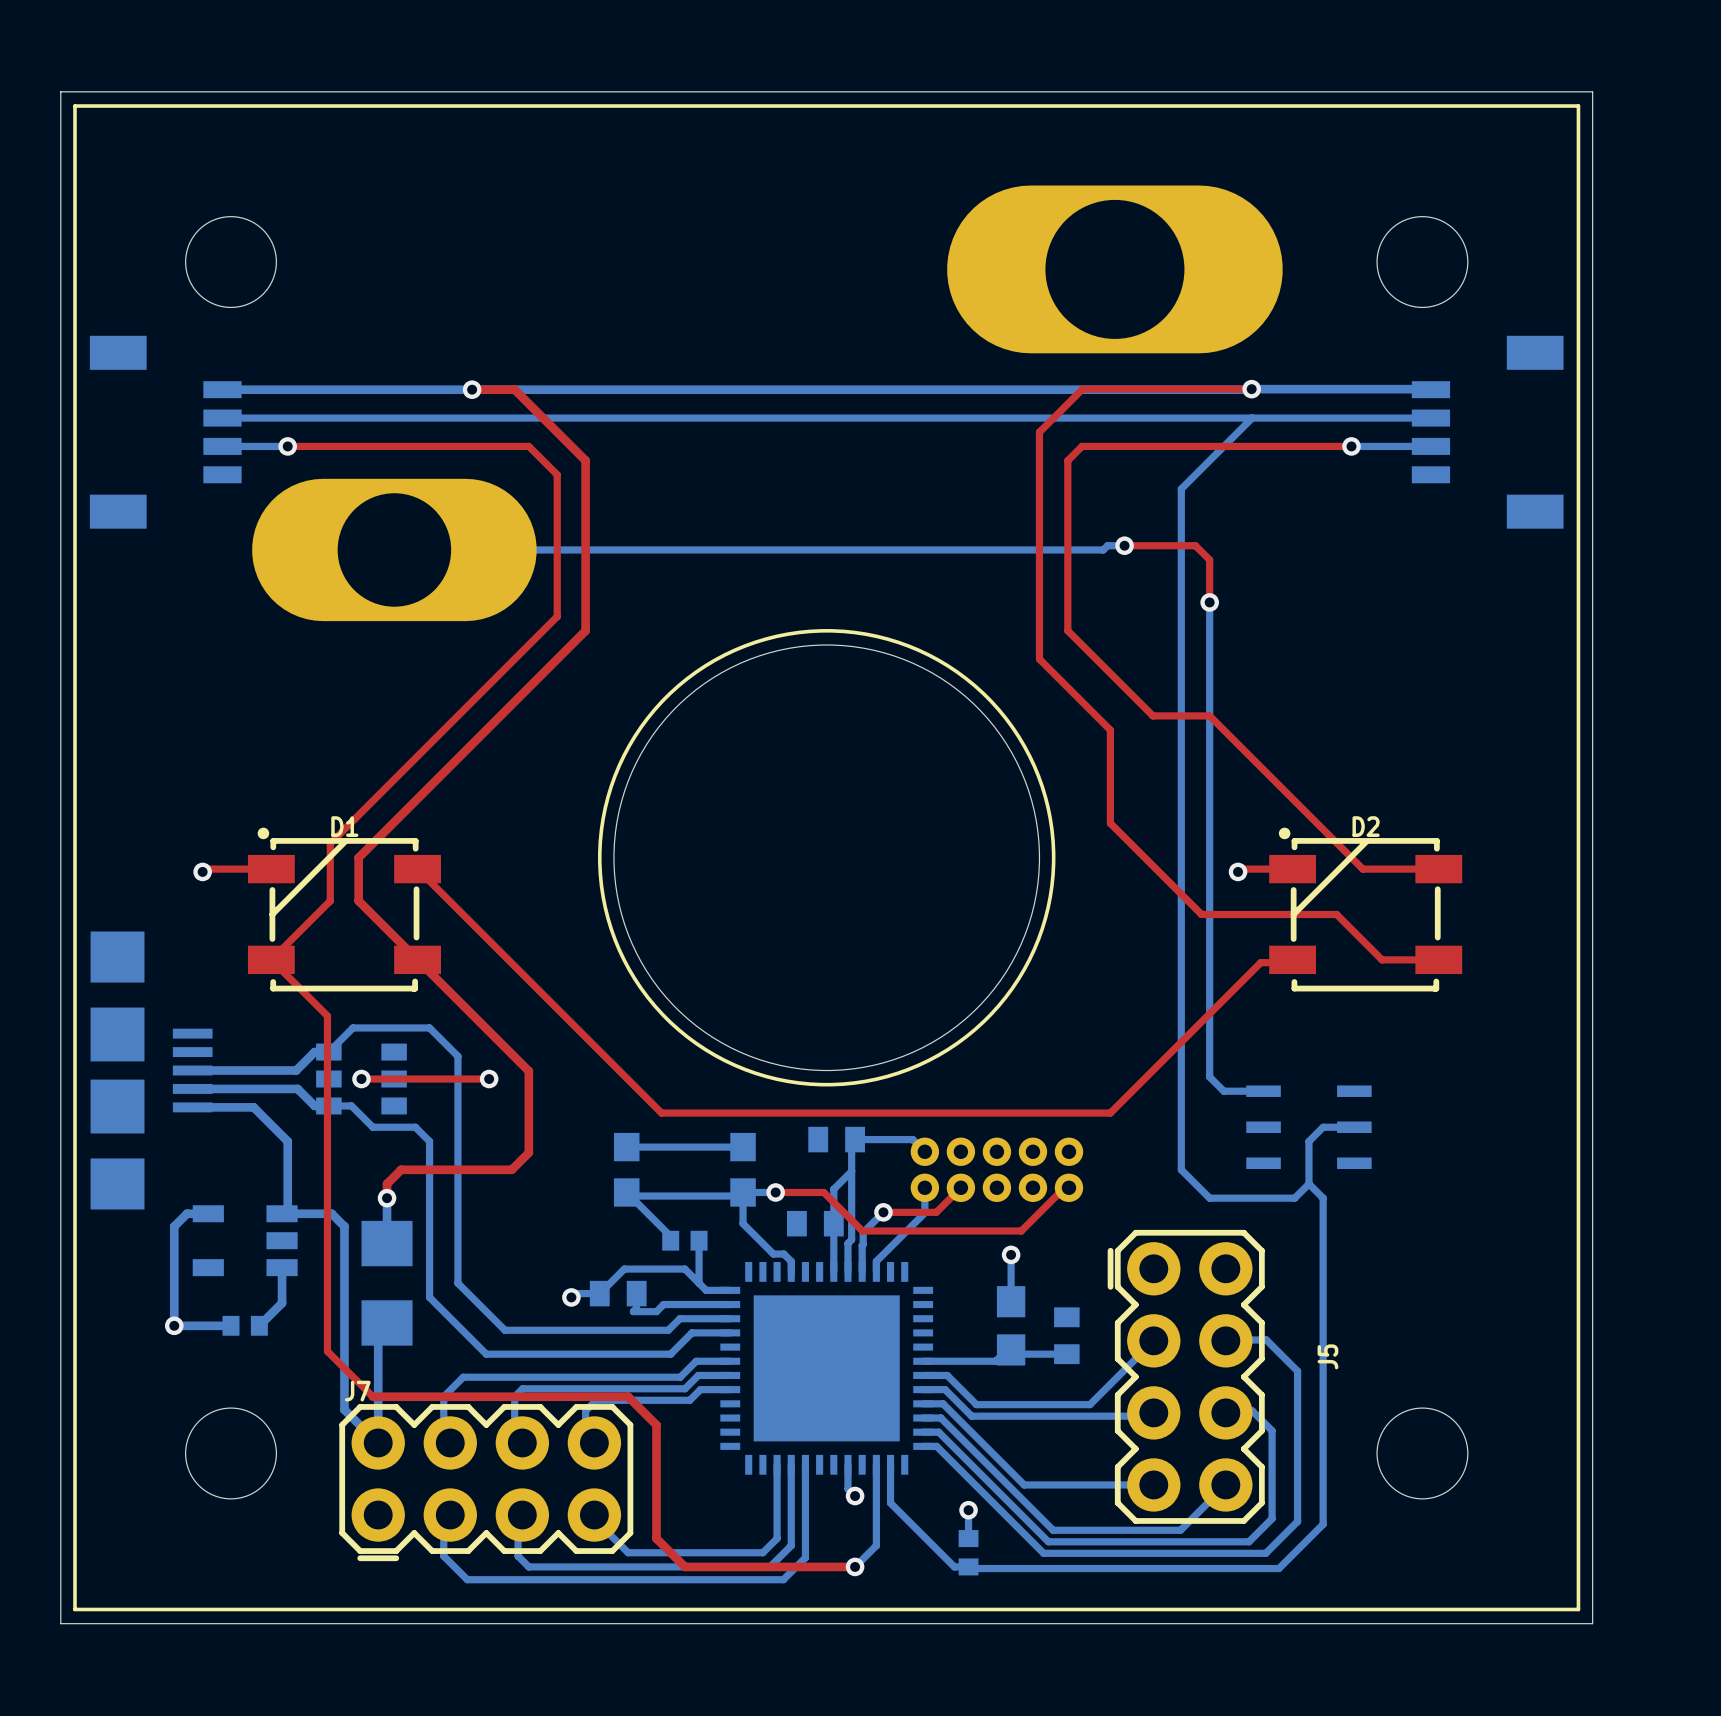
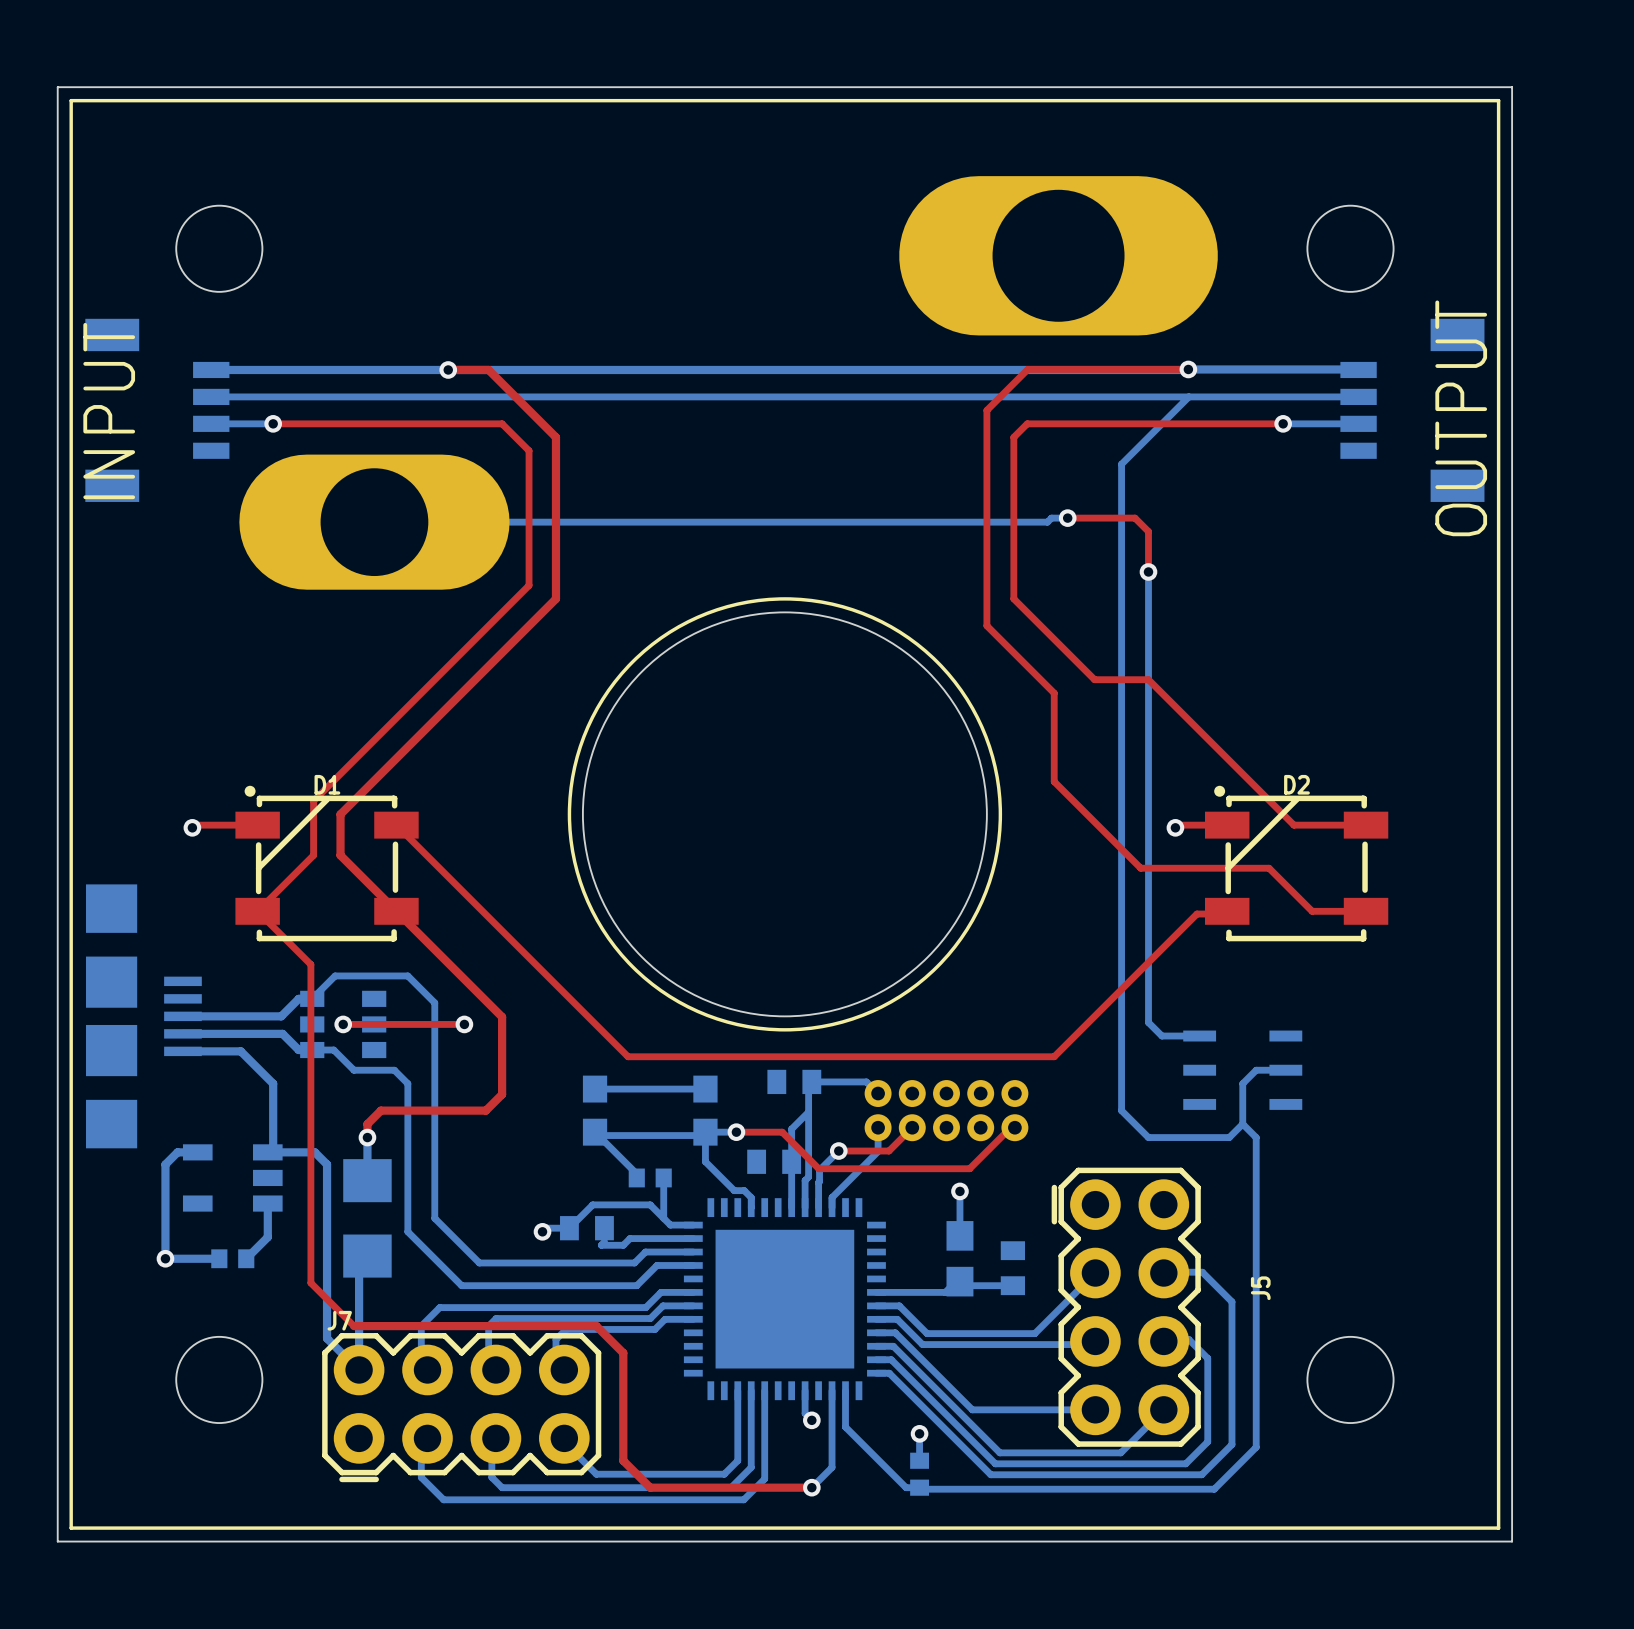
text: none -> INPUT (109, 411)
text: none -> OUTPUT (1461, 418)

